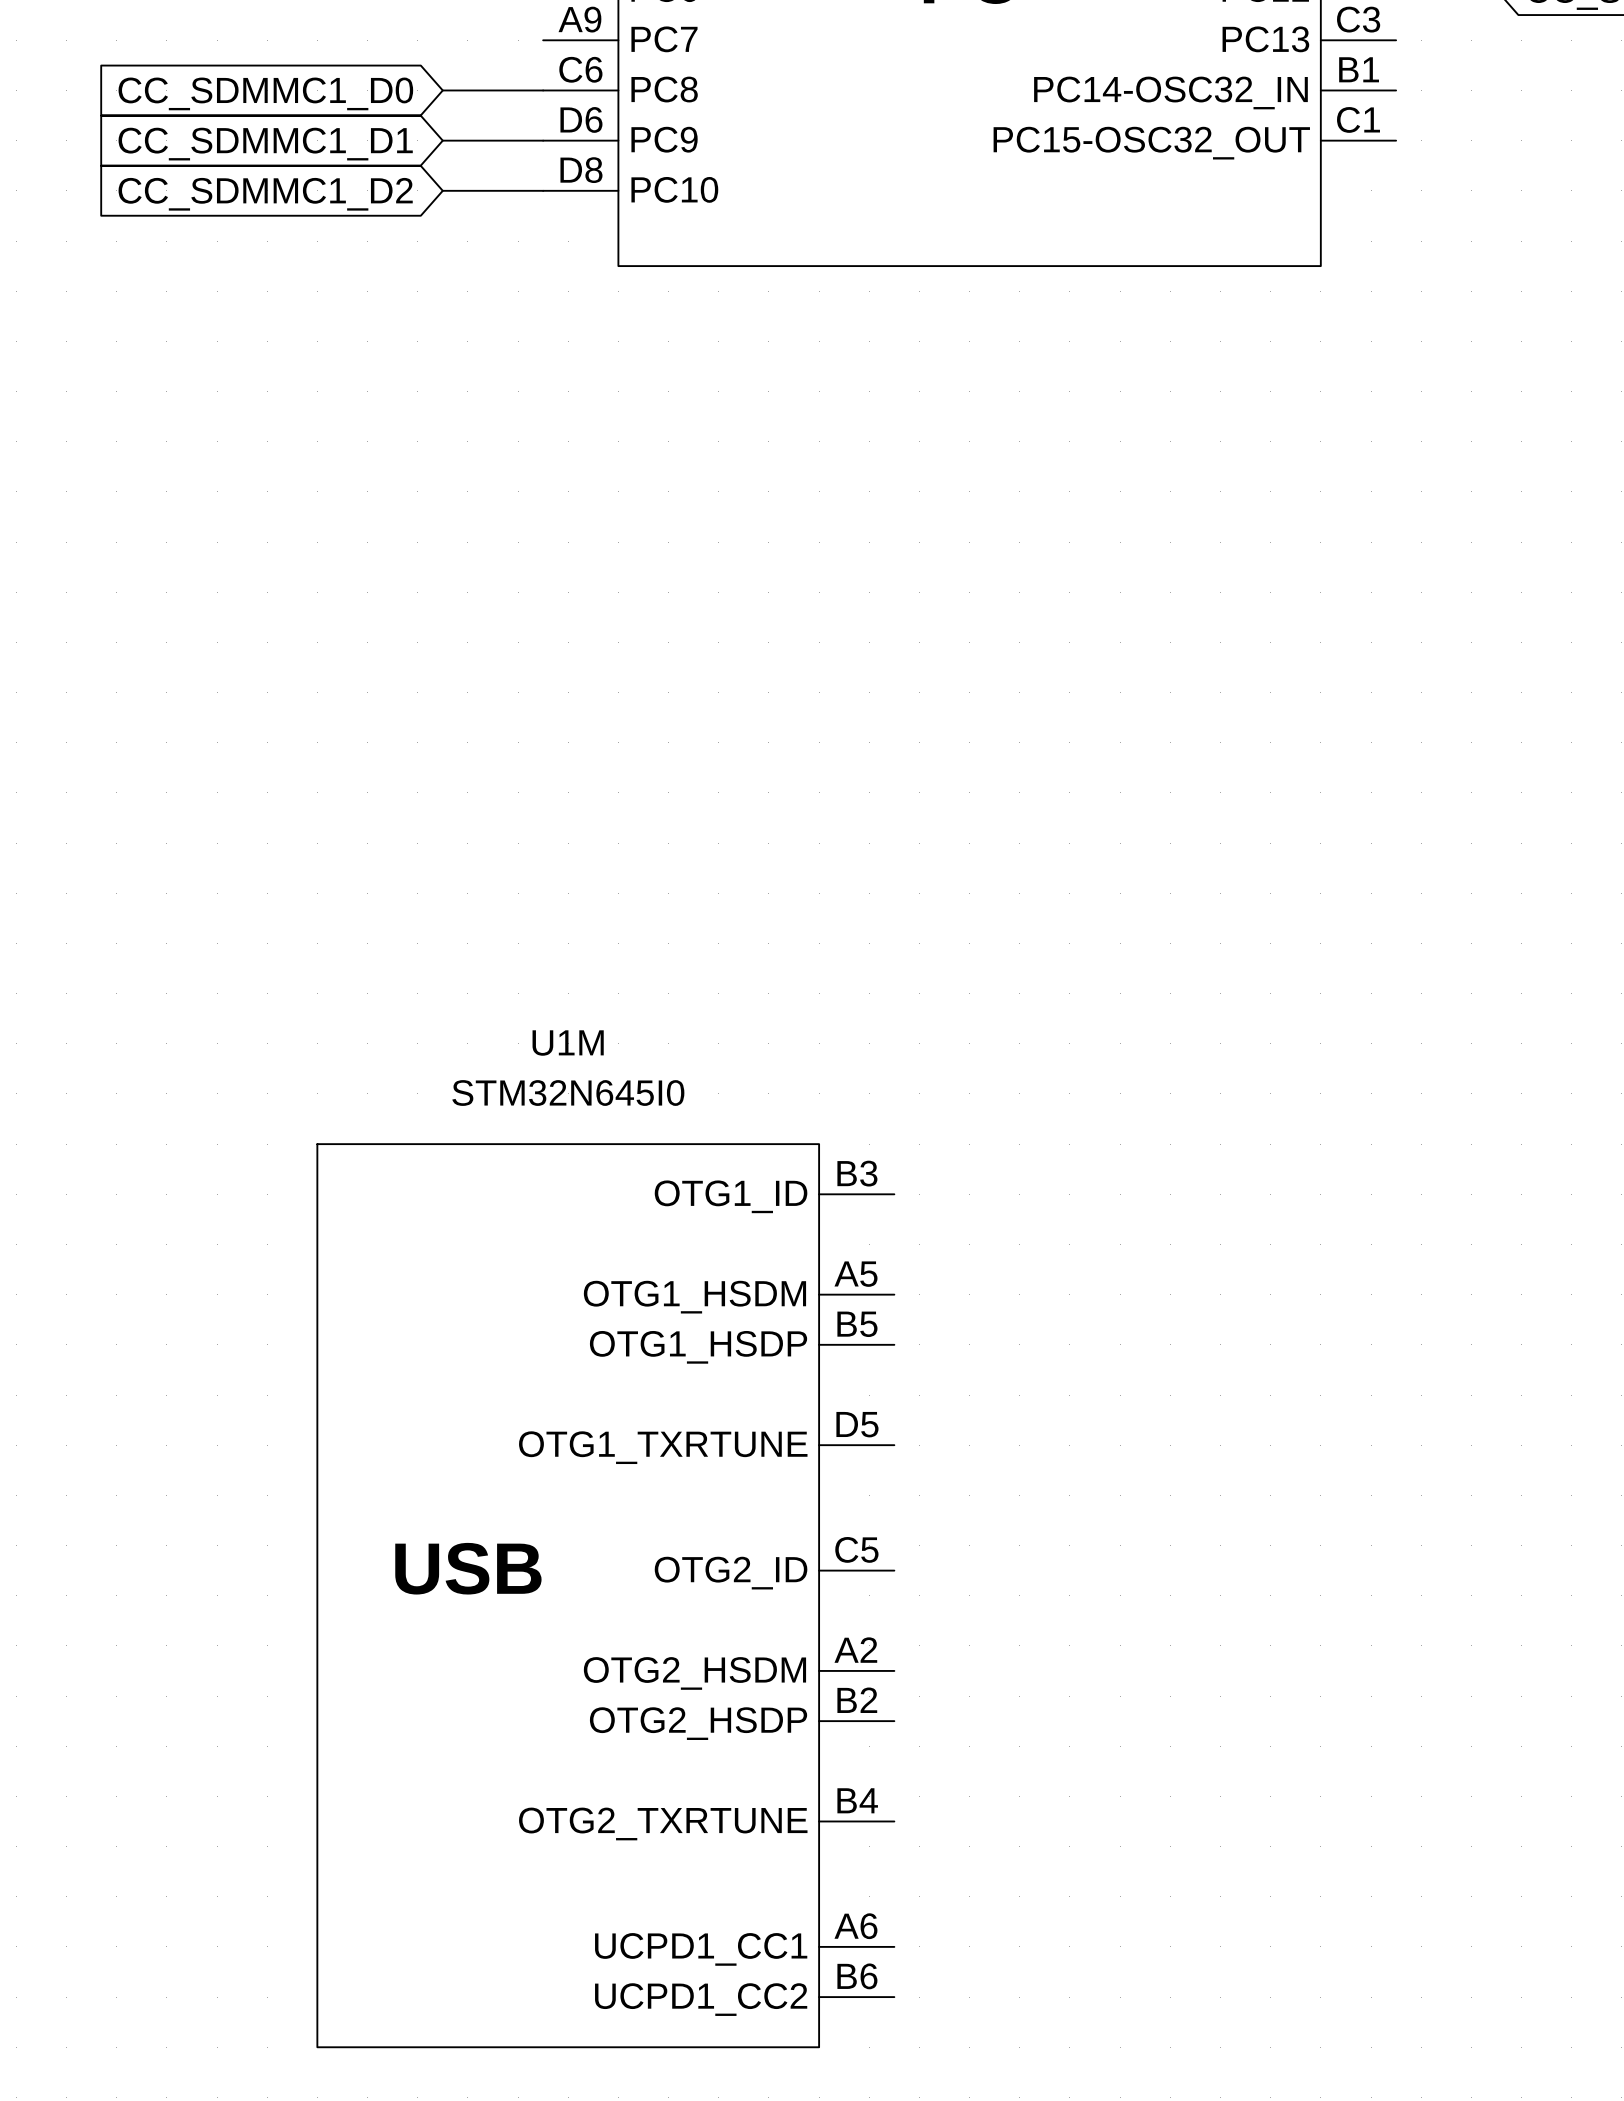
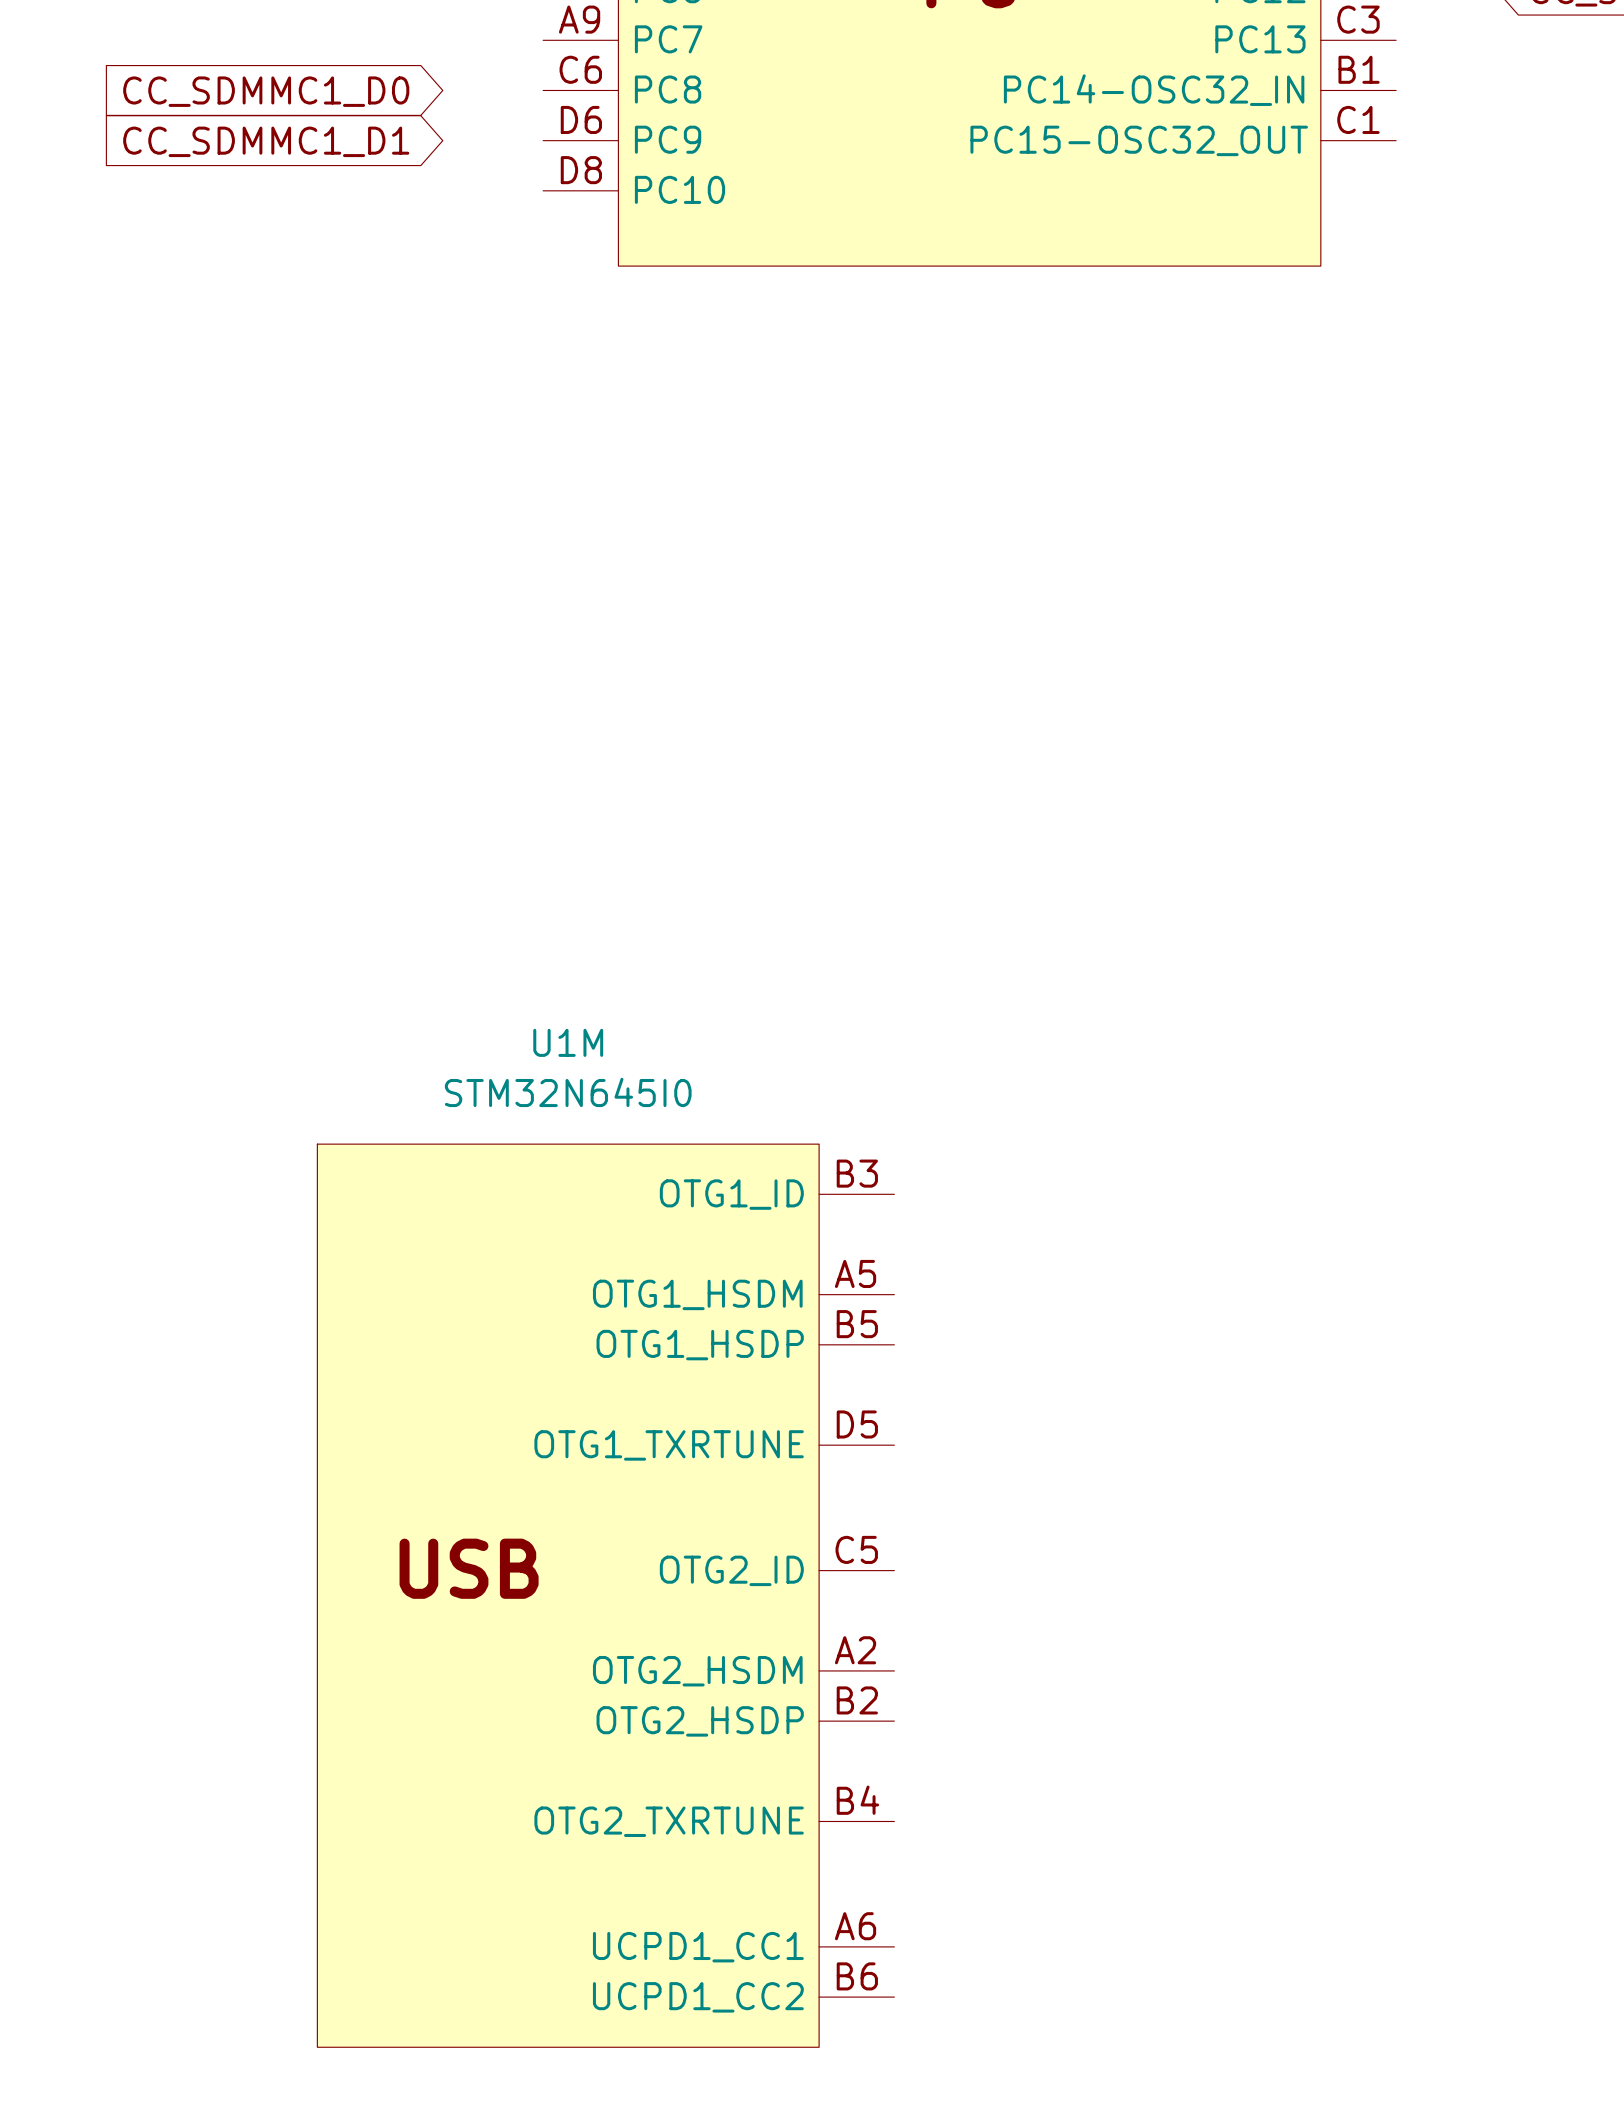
wire: (442, 90) (543, 90) -> none
wire: (442, 140) (543, 140) -> none
wire: (442, 190) (543, 190) -> none
global label: CC_SDMMC1_D2 (265, 194) -> none

